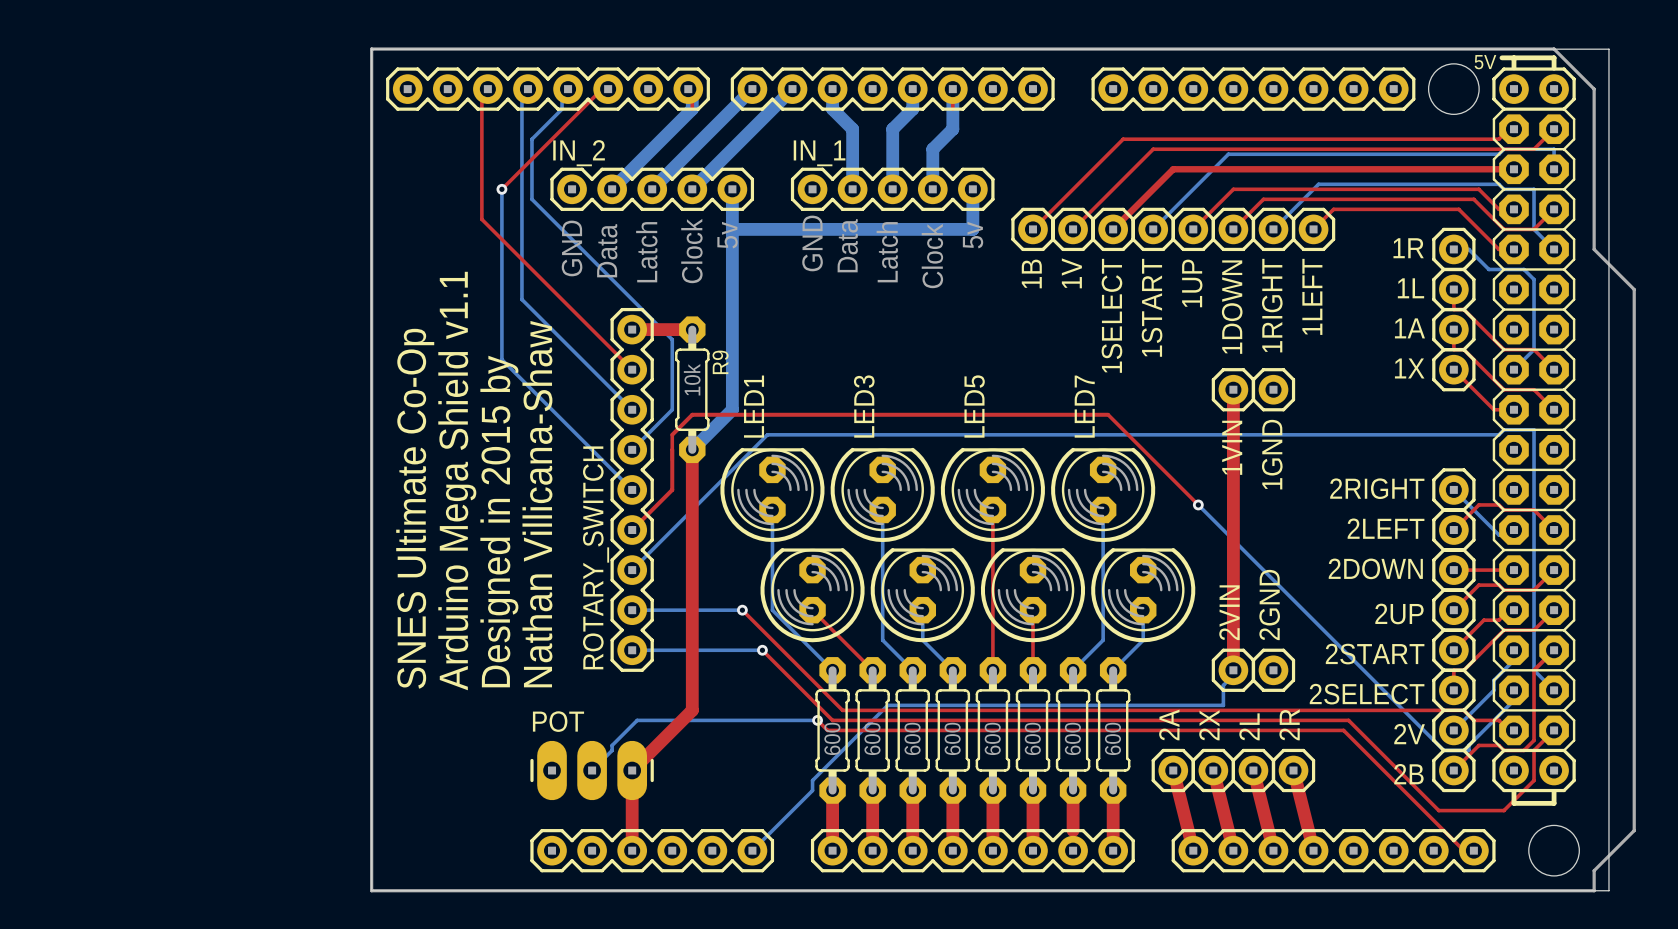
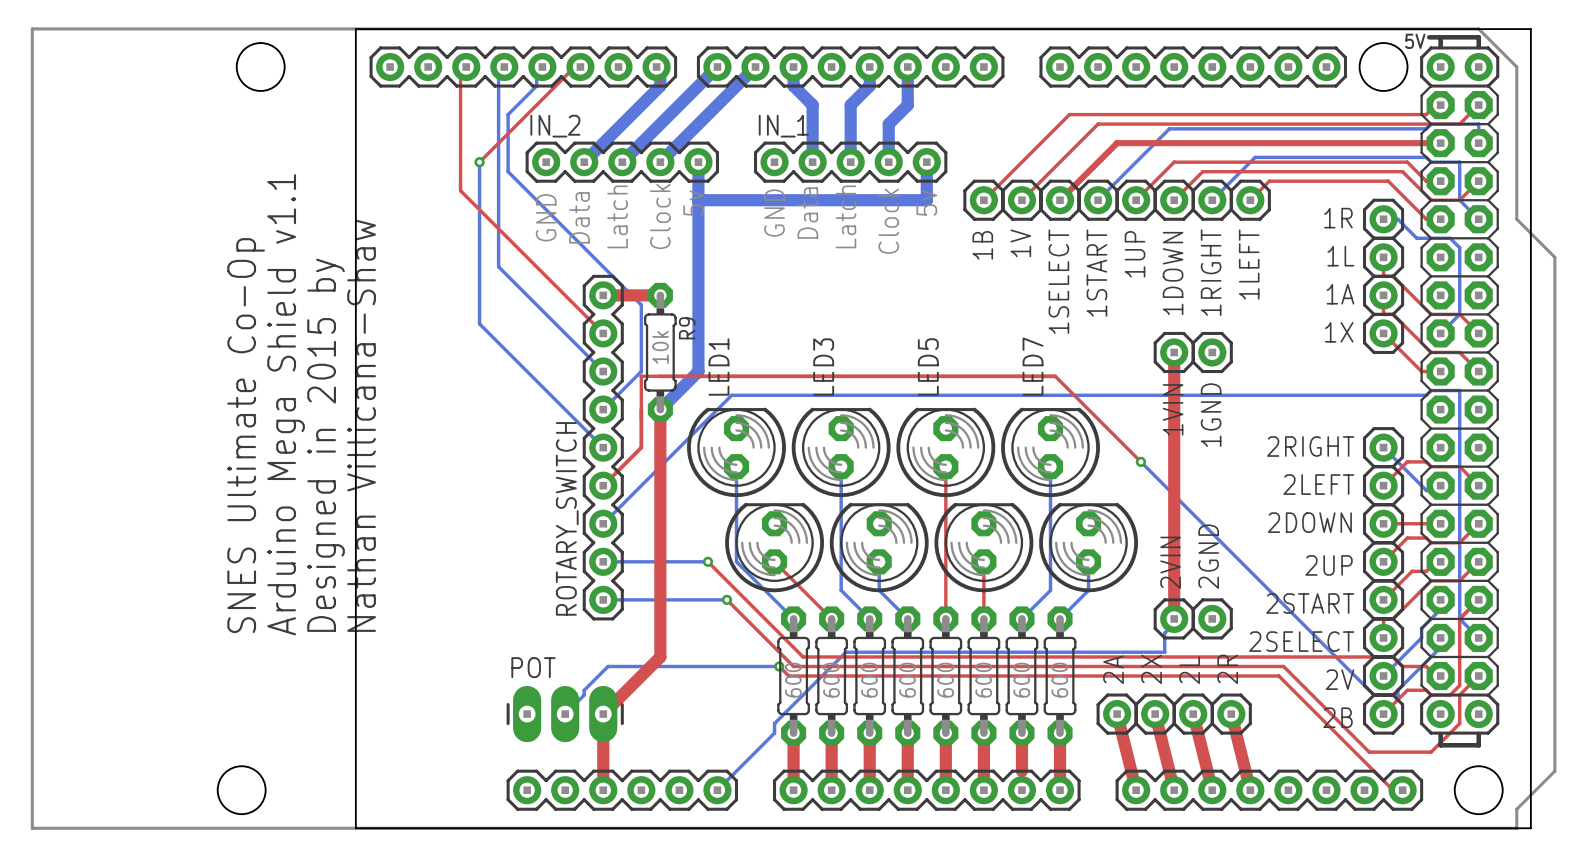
top track: (692, 414) (672, 434) -> (660, 376) (641, 376) (641, 395)
part: none -> (793, 428)
part: (1002, 469) -> none
text position: Arduino Mega Shield v1.1 (457, 481) -> Arduino Mega Shield v1.1 (286, 404)
text position: Nathan Villicana-Shaw (537, 504) -> Nathan Villicana-Shaw (361, 425)
text position: SNES Ultimate Co-Op (415, 508) -> SNES Ultimate Co-Op (246, 435)
text position: Designed in 2015 by (499, 521) -> Designed in 2015 by (326, 445)

